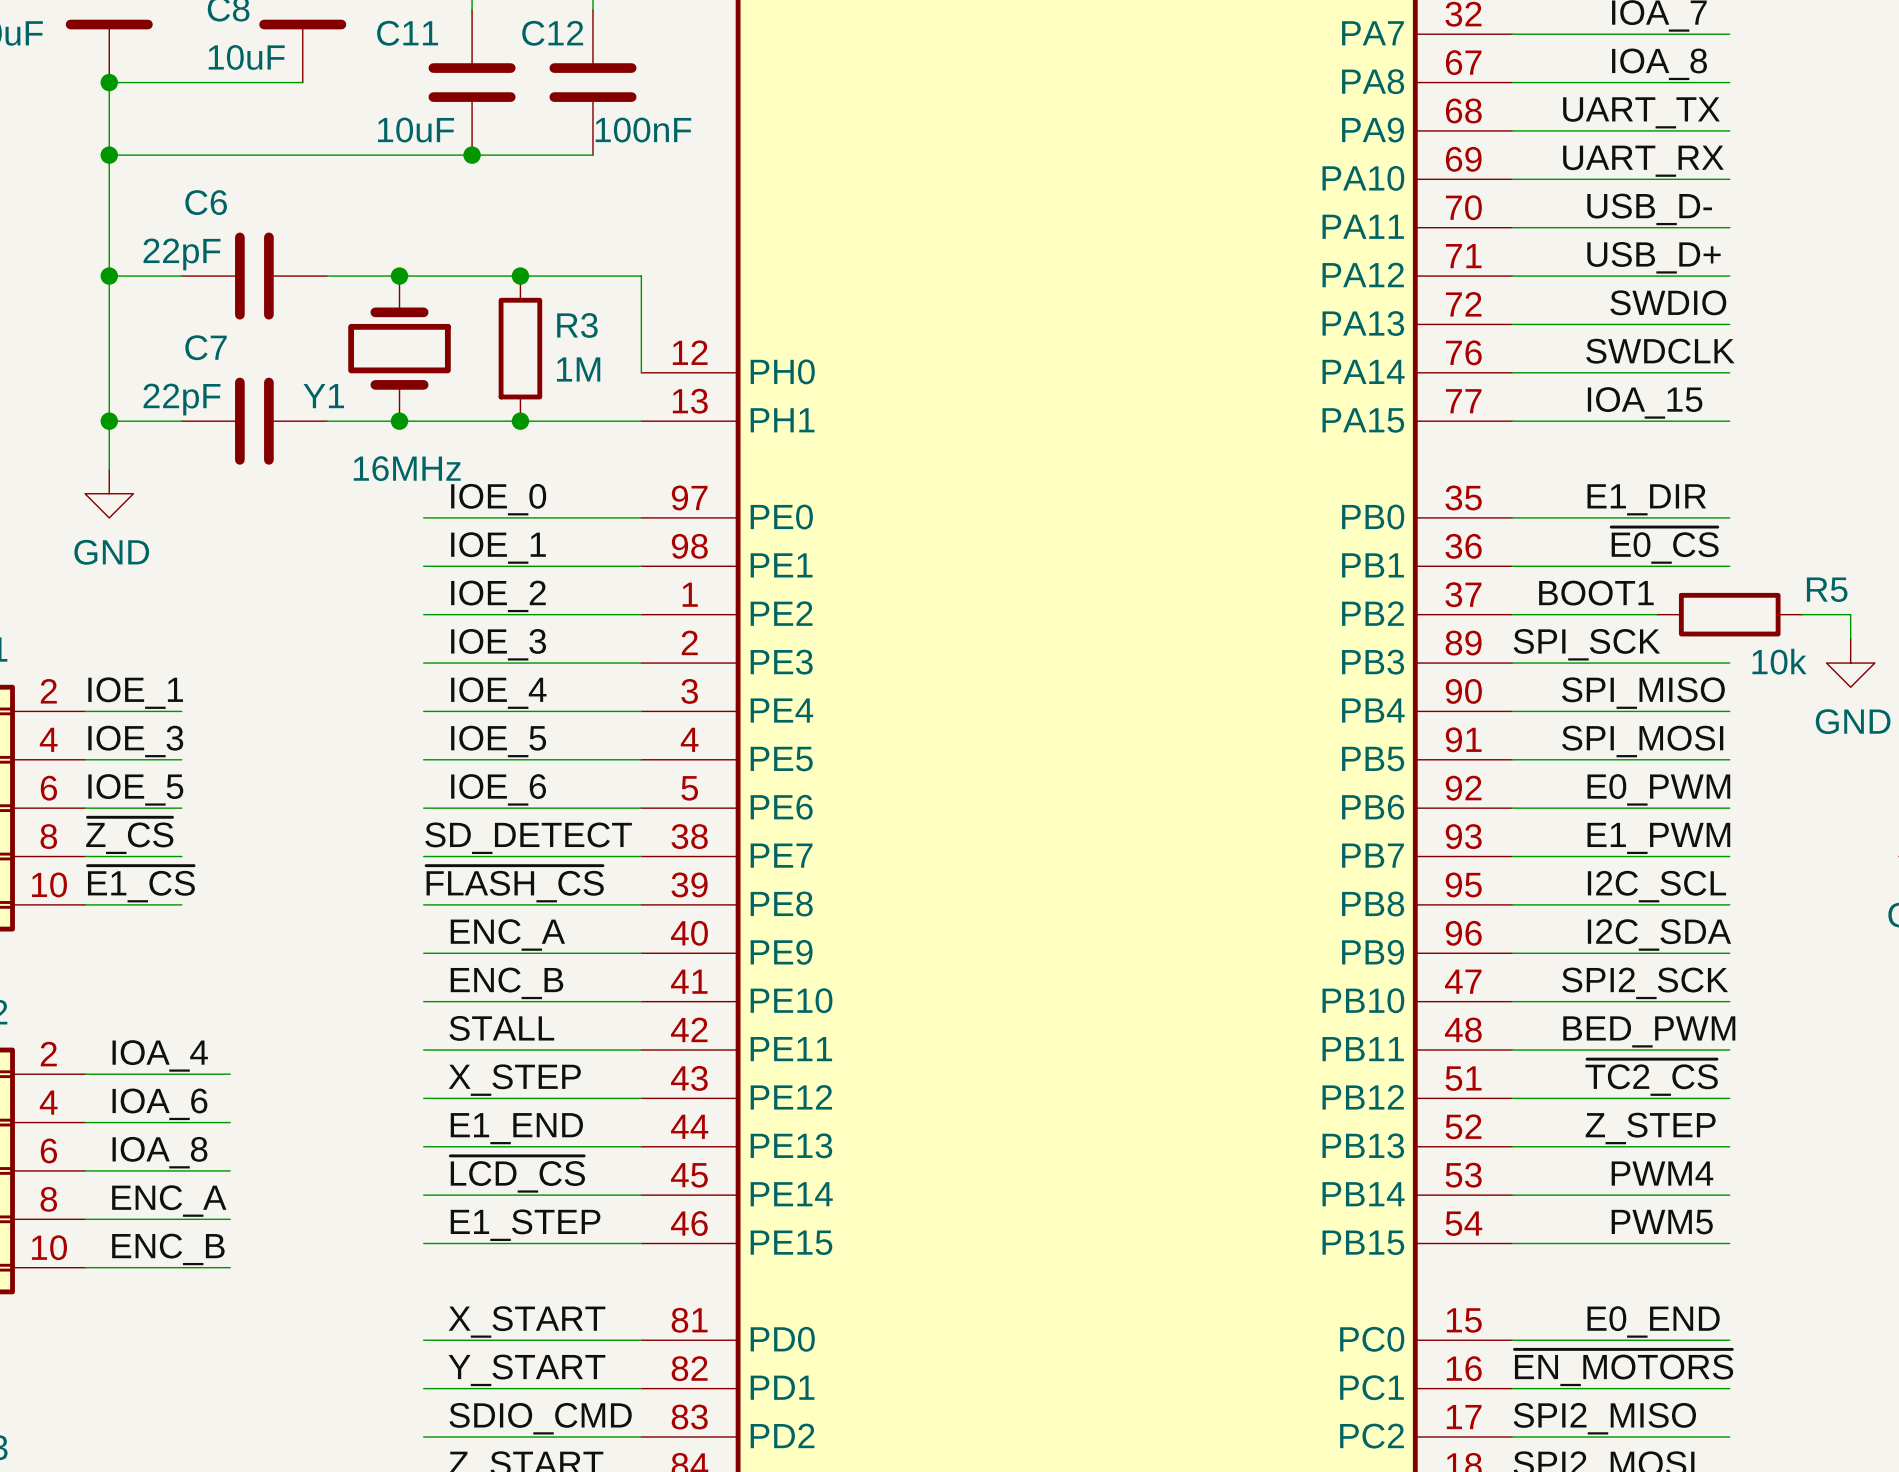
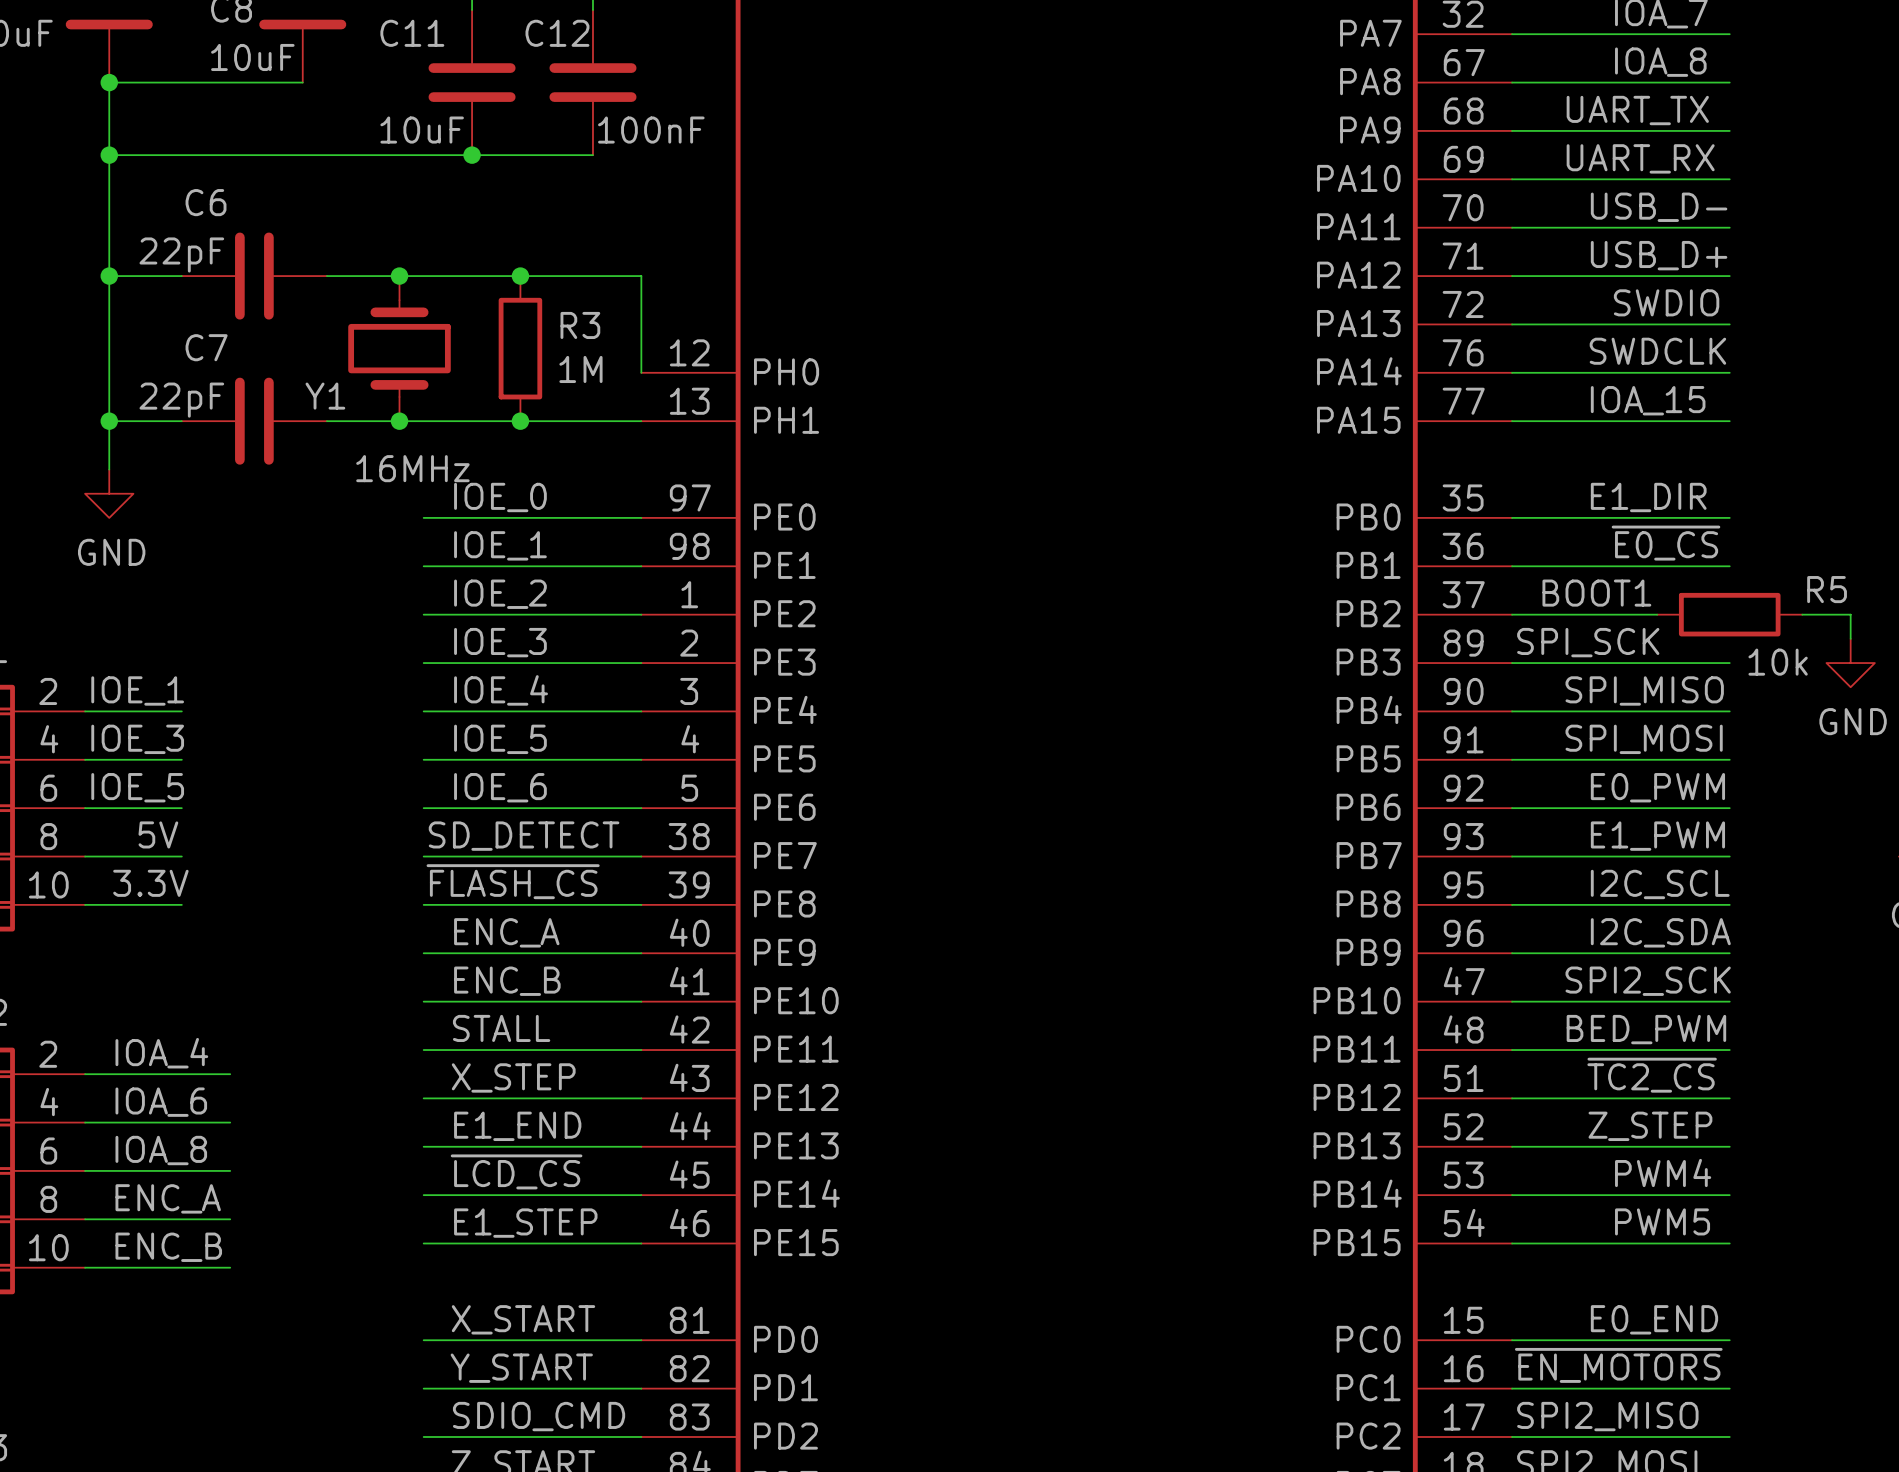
label: ~{Z_CS} (129, 835) -> none
label: none -> 5V (158, 834)
label: none -> 3.3V (150, 883)
label: ~{E1_CS} (141, 884) -> none

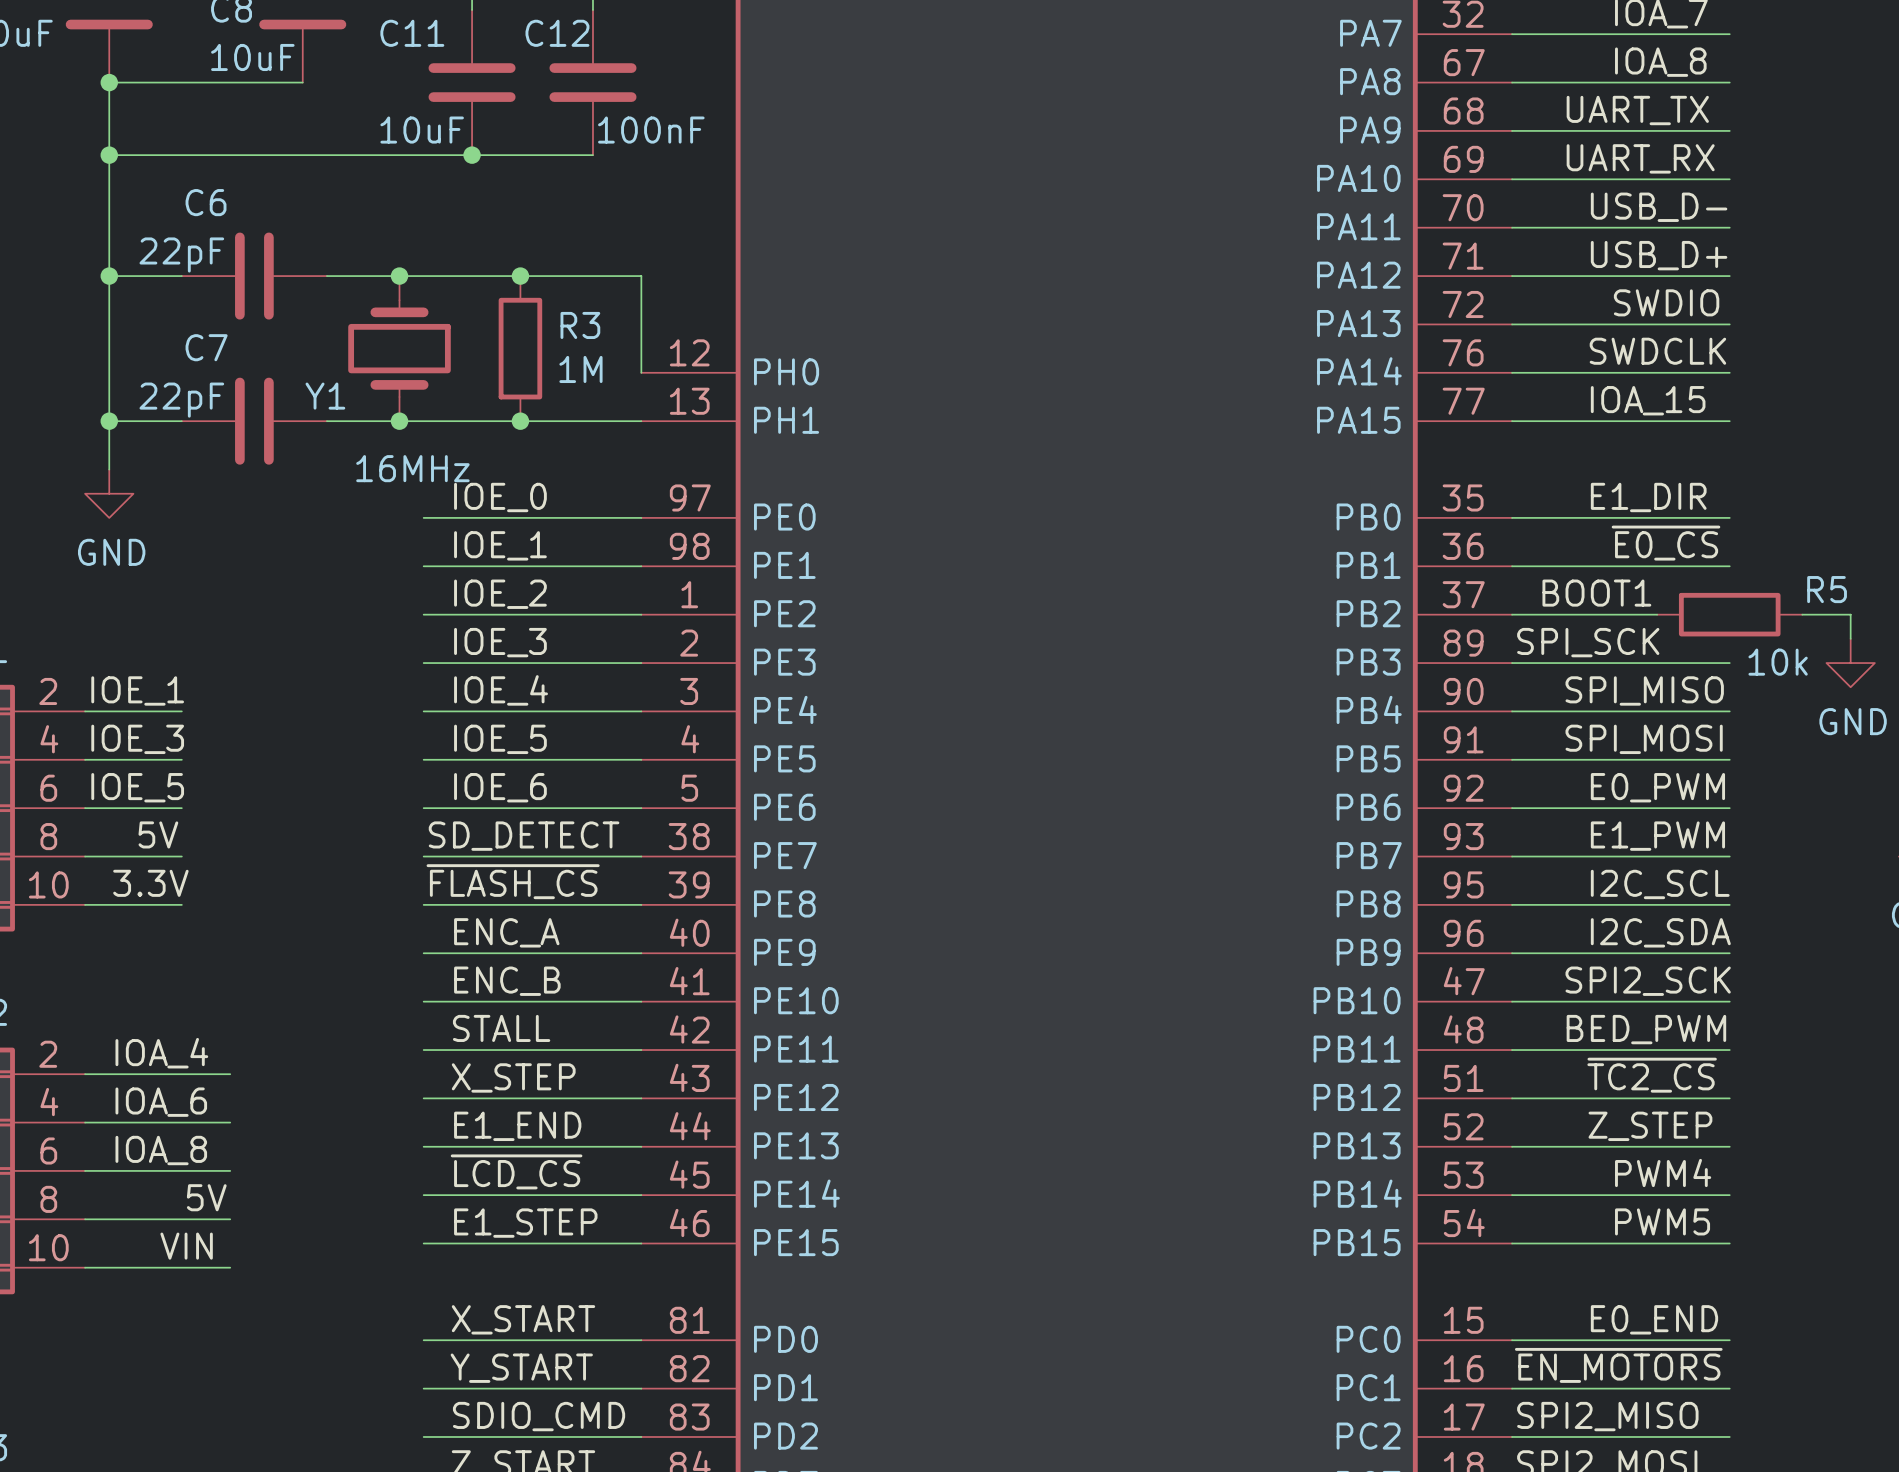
label: none -> 5V (206, 1197)
label: ENC_A (168, 1198) -> none
label: none -> VIN (186, 1246)
label: ENC_B (168, 1247) -> none

